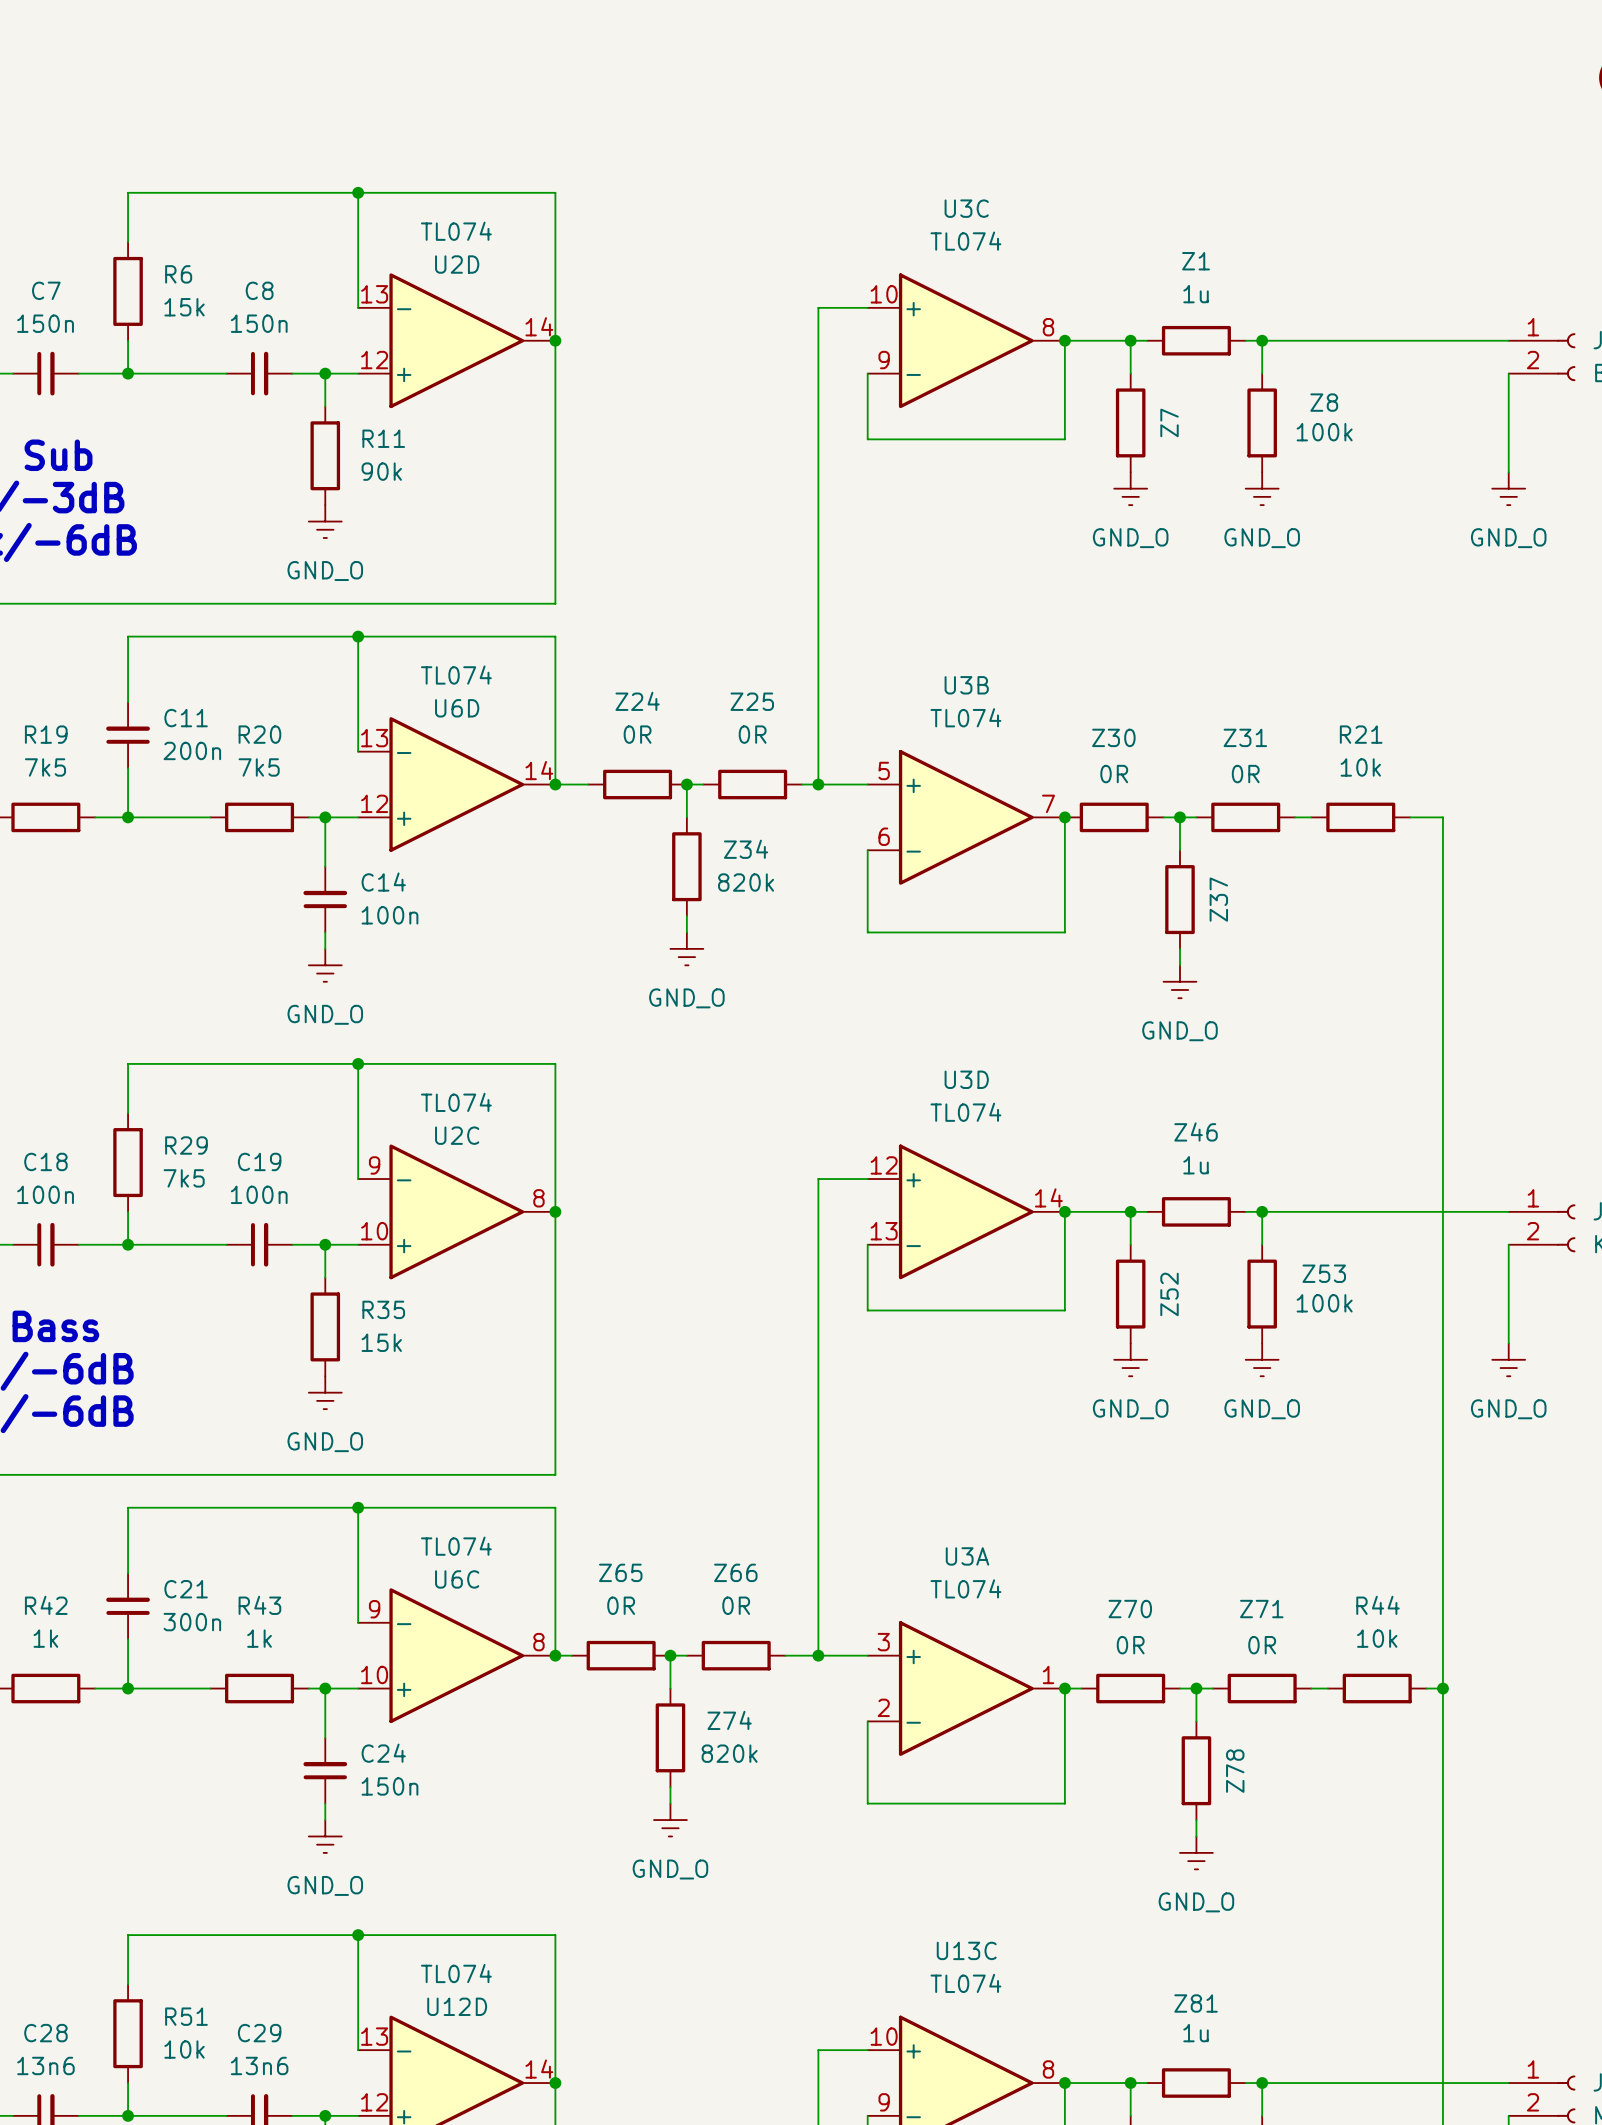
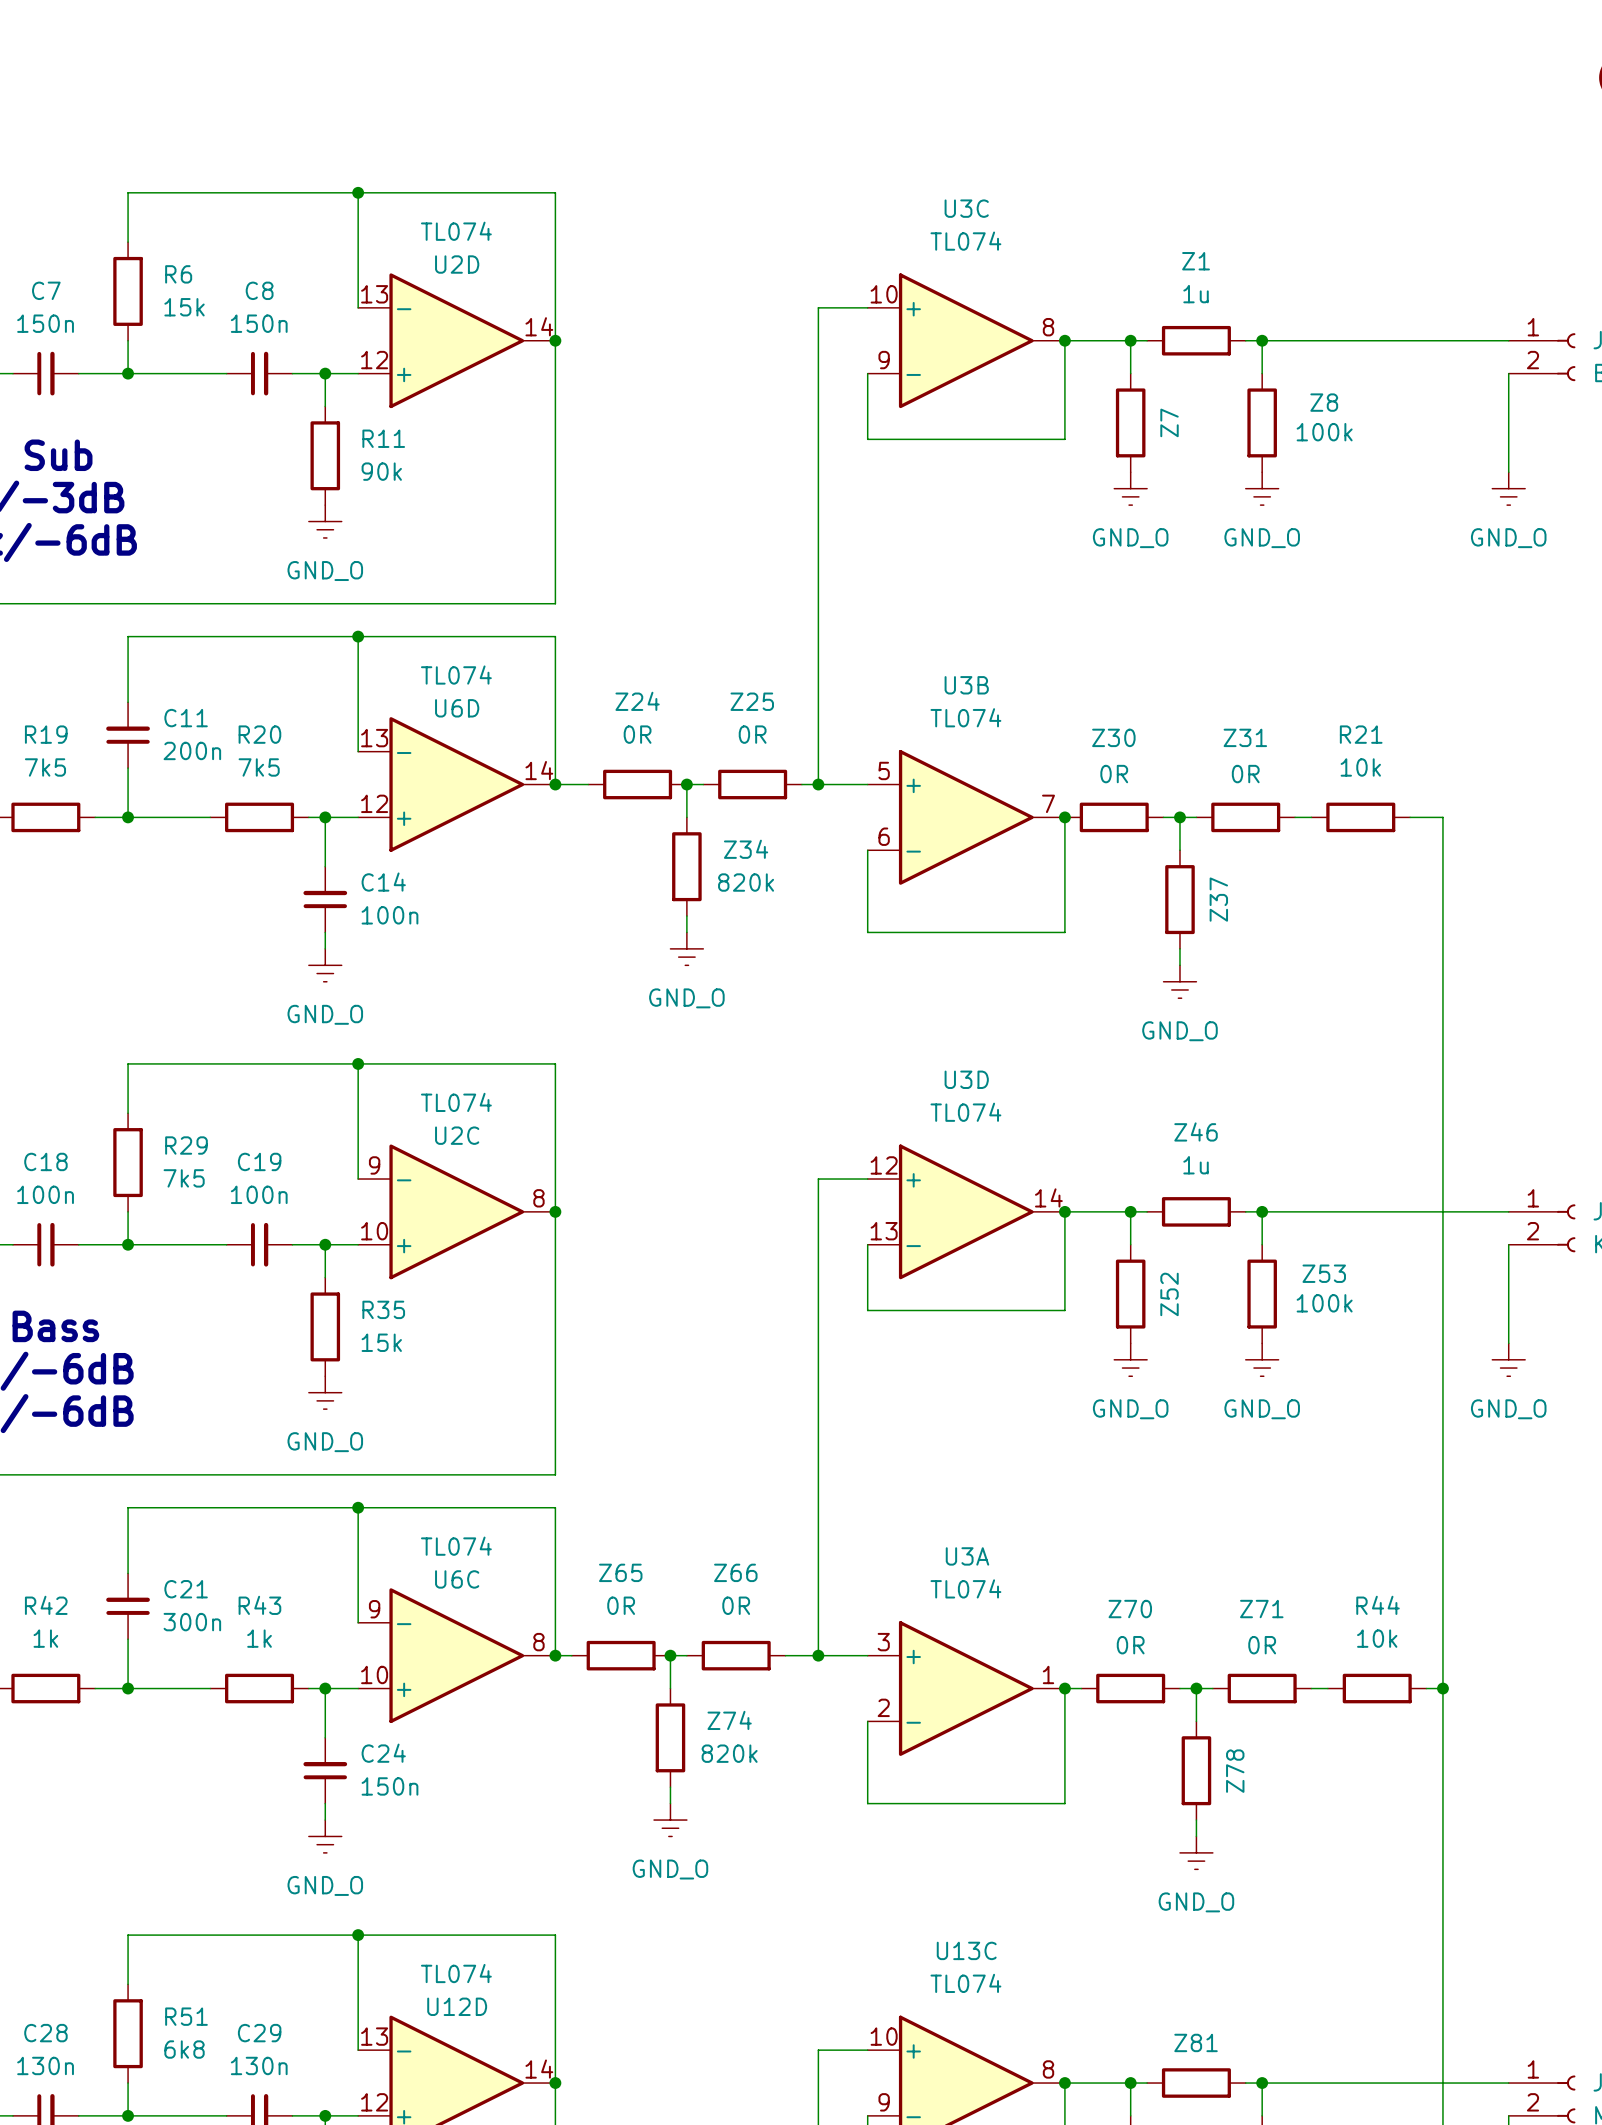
Z81 name position: Z81 (1196, 2003) -> Z81 (1196, 2042)
Z81 value: 1u (1196, 2033) -> none
R51 value: 10k (184, 2049) -> 6k8 (184, 2049)
C28 value: 13n6 (45, 2065) -> 130n (45, 2065)
C29 value: 13n6 (259, 2065) -> 130n (259, 2065)

